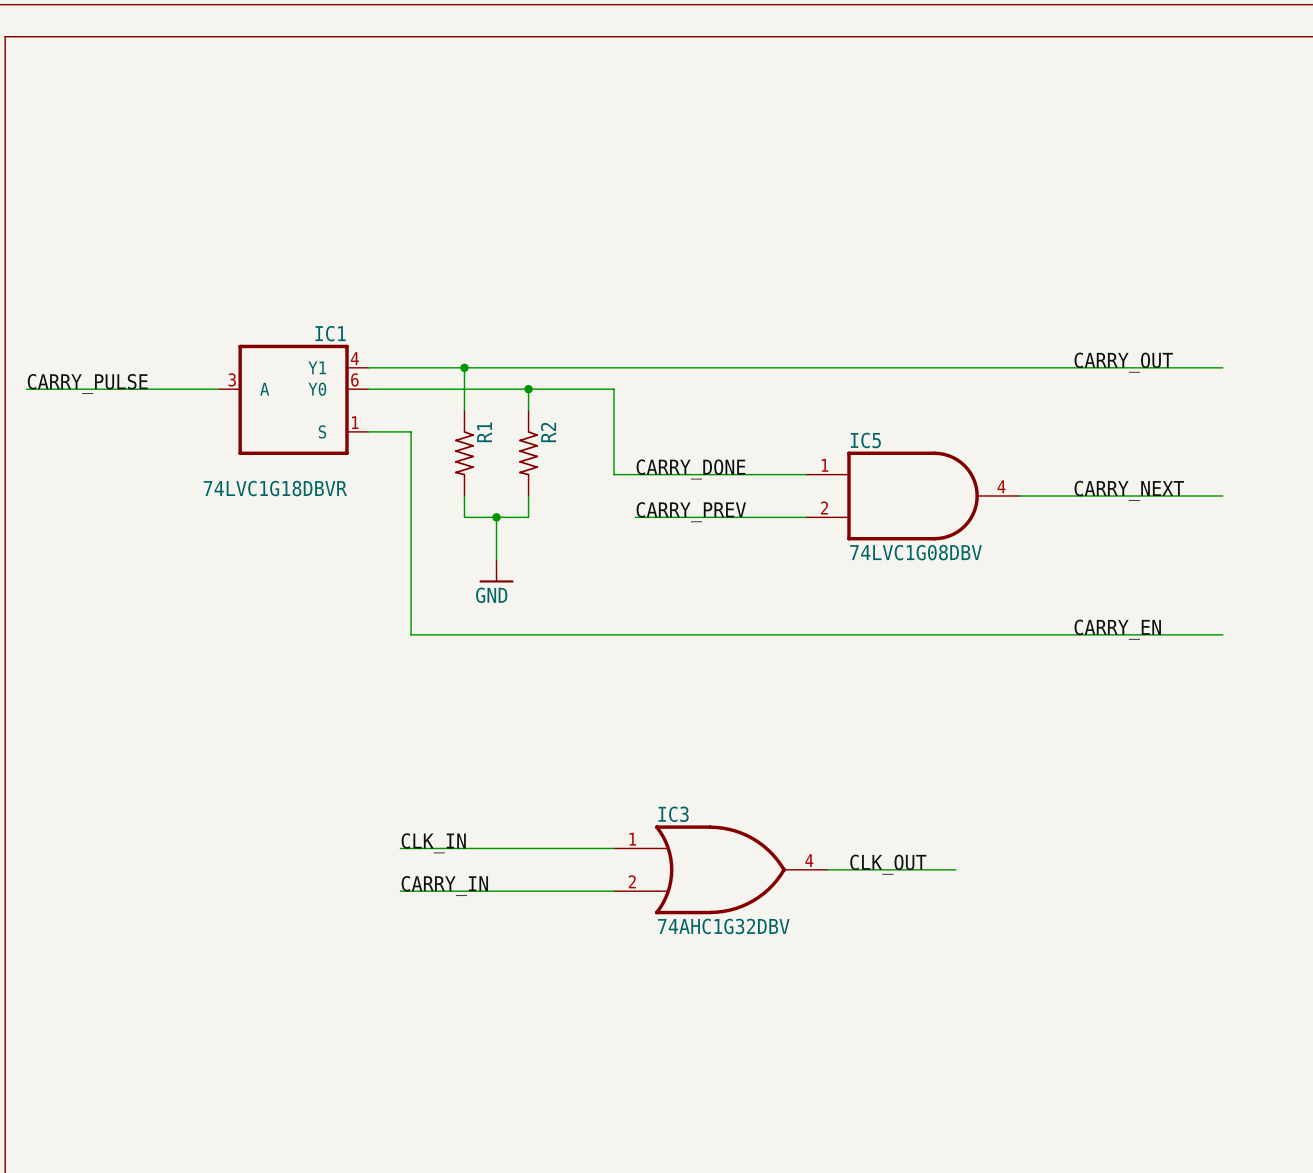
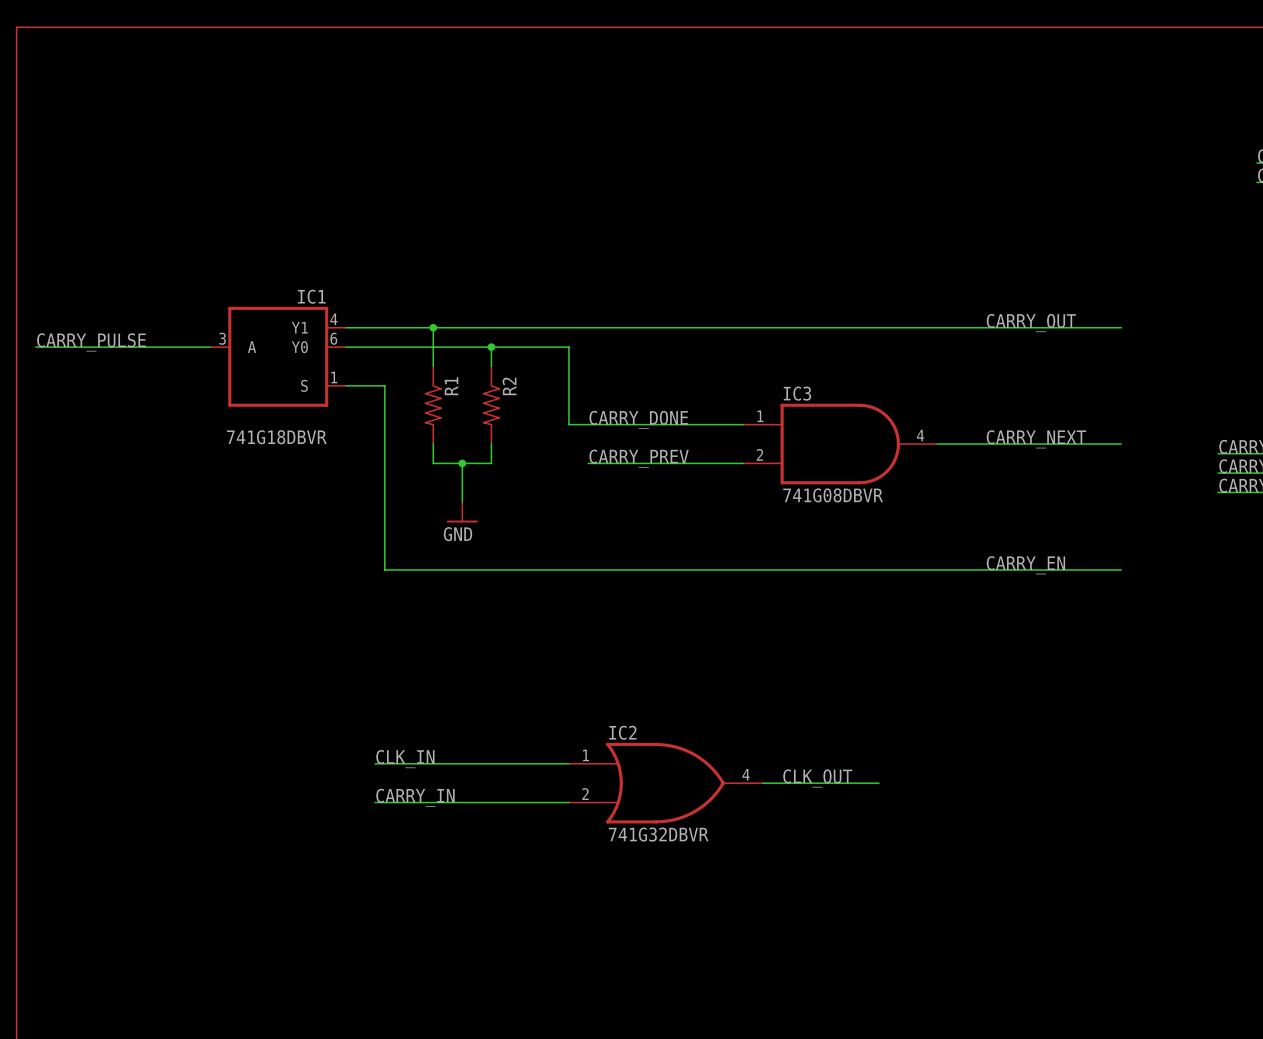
IC5 name: IC5 (865, 440) -> IC3 (797, 393)
IC1 value: 74LVC1G18DBVR (275, 488) -> 741G18DBVR (276, 437)
IC5 value: 74LVC1G08DBV (916, 552) -> 741G08DBVR (833, 495)
IC3 name: IC3 (673, 814) -> IC2 (622, 732)
IC3 value: 74AHC1G32DBV (723, 926) -> 741G32DBVR (658, 834)

